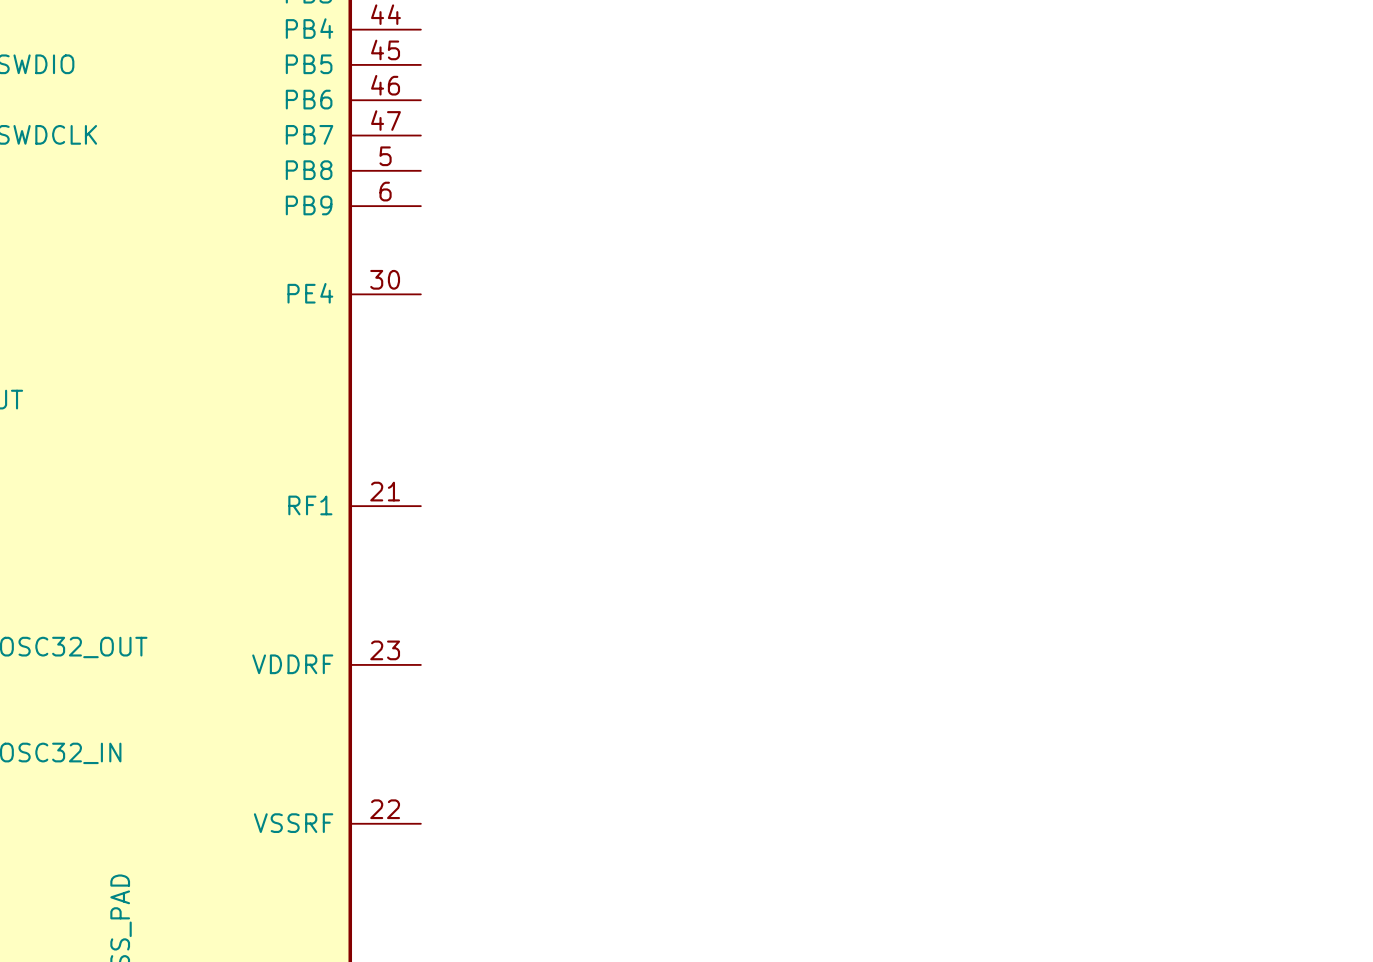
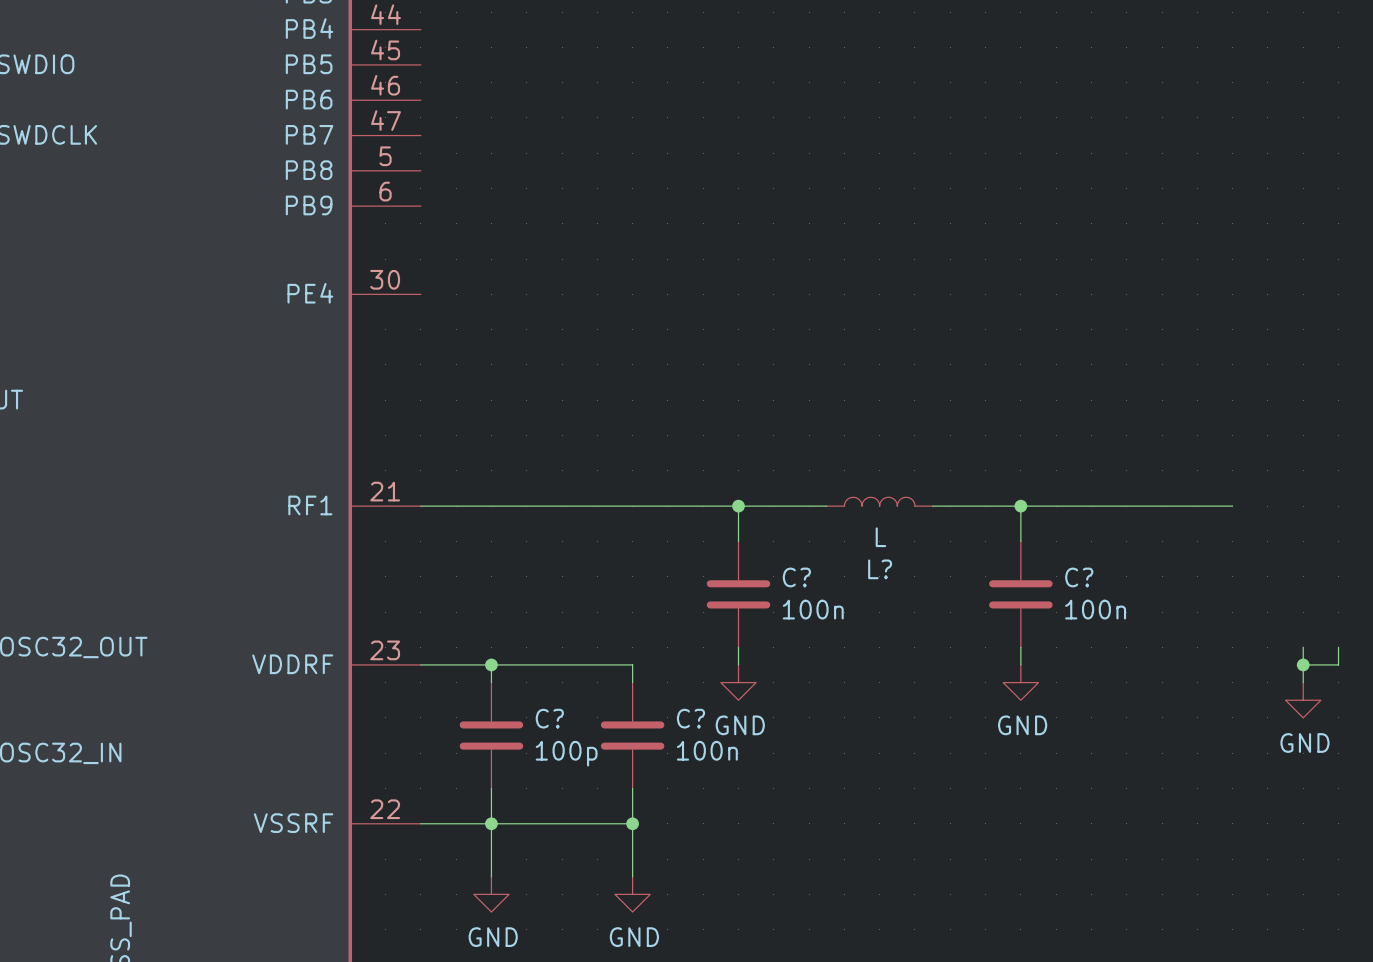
L?: none -> L (879, 501)
wire: none -> (420, 506) (826, 506)
wire: none -> (738, 506) (738, 541)
junction: none -> (738, 506)
wire: none -> (932, 506) (1232, 506)
wire: none -> (1020, 506) (1020, 541)
junction: none -> (1020, 506)
C?: none -> 100n (738, 594)
C?: none -> 100n (1020, 594)
wire: none -> (738, 647) (738, 664)
wire: none -> (1020, 647) (1020, 664)
wire: none -> (1303, 647) (1303, 682)
wire: none -> (1338, 647) (1338, 664) (1303, 664)
wire: none -> (420, 664) (632, 664) (632, 682)
wire: none -> (491, 664) (491, 682)
junction: none -> (491, 664)
junction: none -> (1303, 664)
power symbol: none -> GND (738, 682)
power symbol: none -> GND (1020, 682)
power symbol: none -> GND (1303, 700)
C?: none -> 100p (491, 735)
C?: none -> 100n (632, 735)
wire: none -> (491, 788) (491, 876)
wire: none -> (632, 788) (632, 876)
wire: none -> (420, 823) (632, 823)
junction: none -> (491, 823)
junction: none -> (632, 823)
power symbol: none -> GND (491, 894)
power symbol: none -> GND (632, 894)

